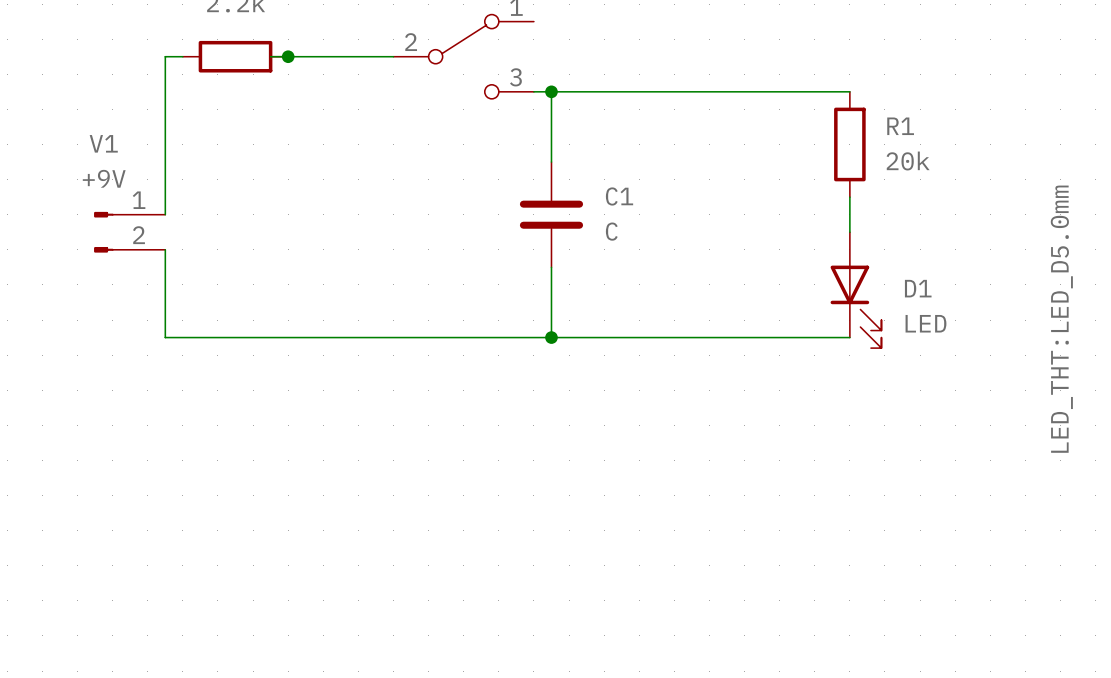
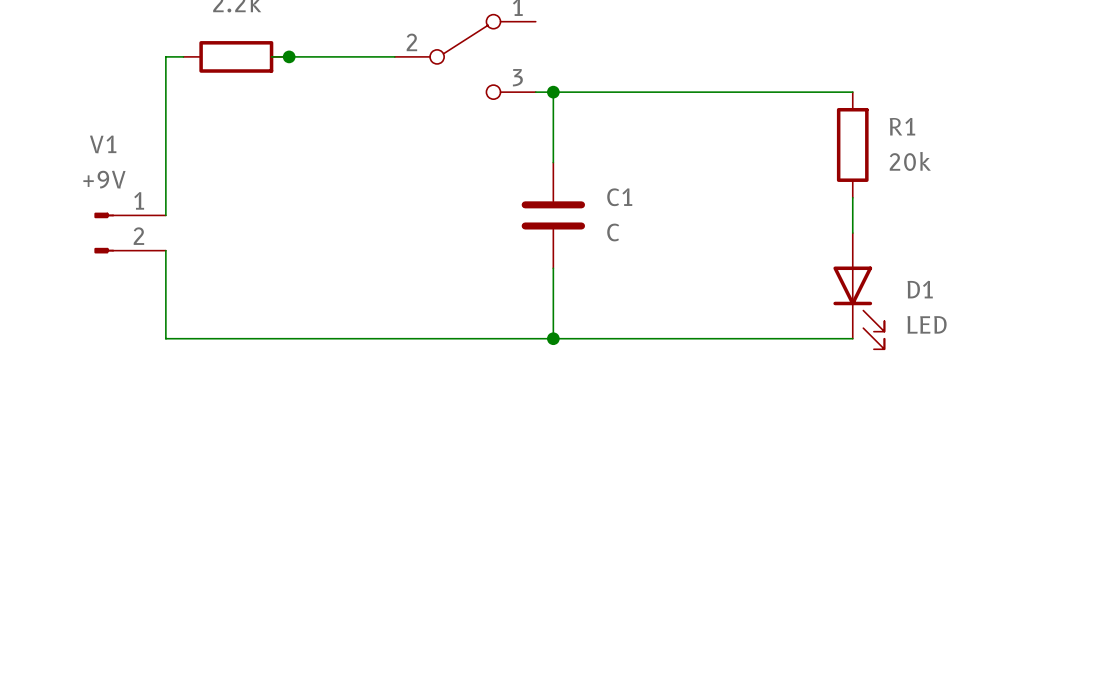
D1 text: LED_THT:LED_D5.0mm (1061, 319) -> none

